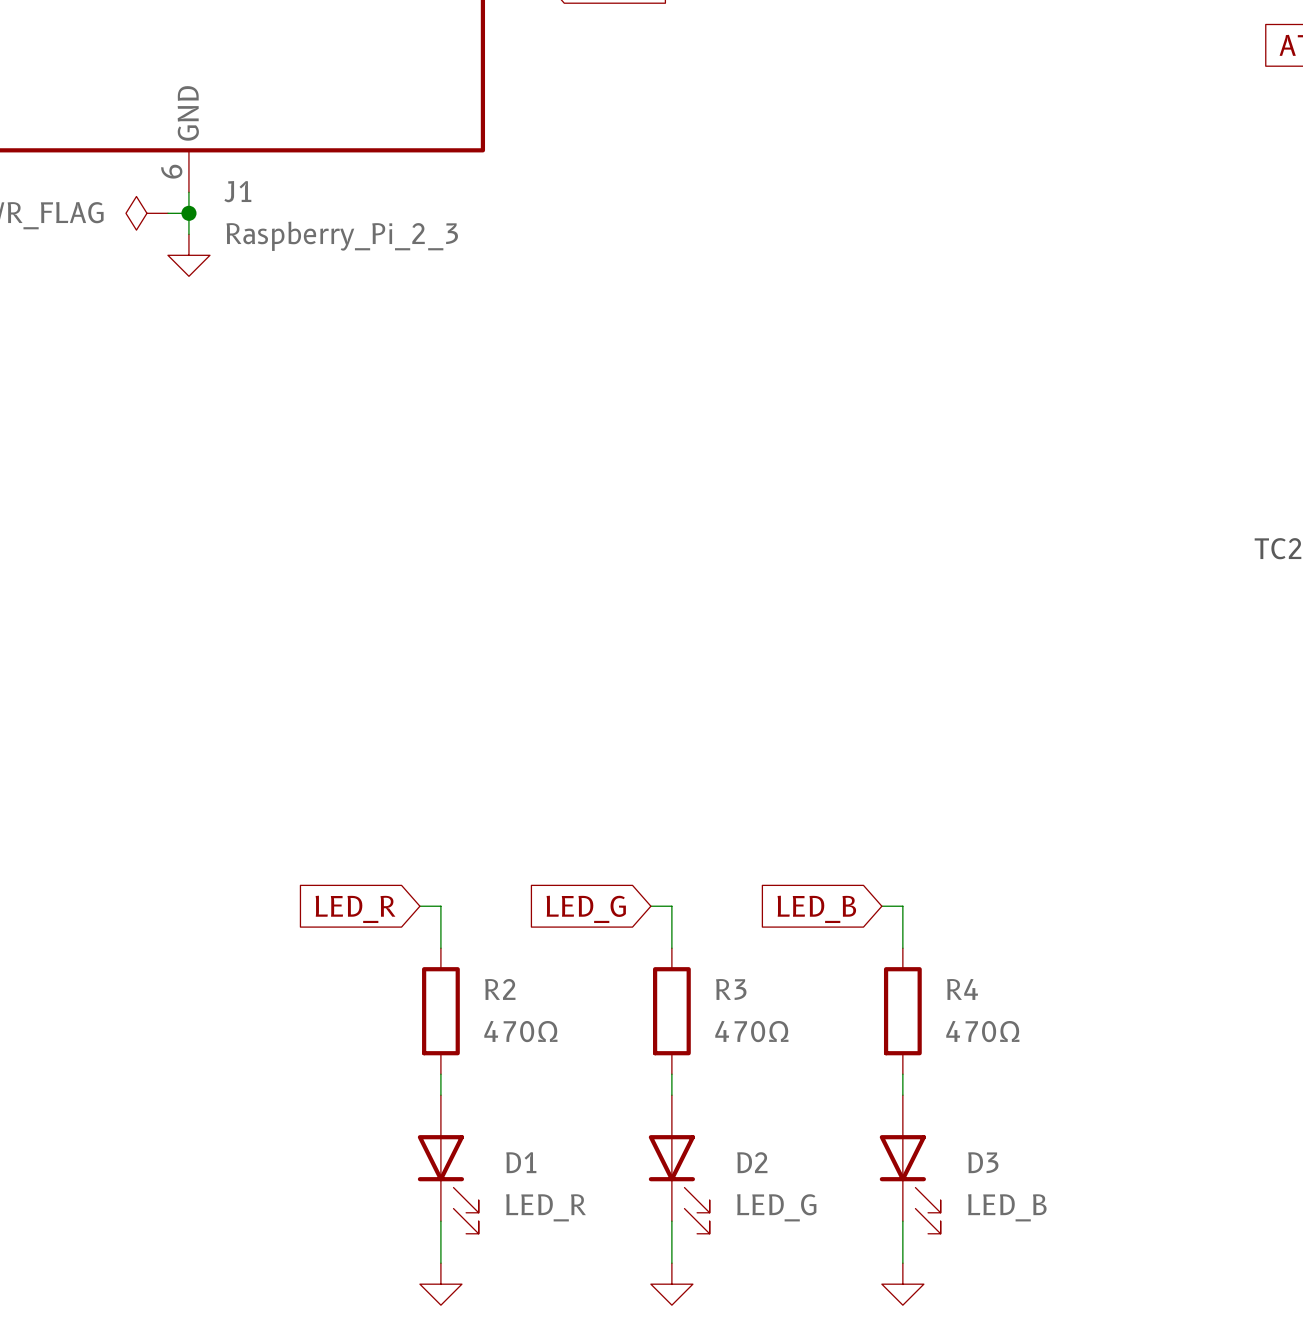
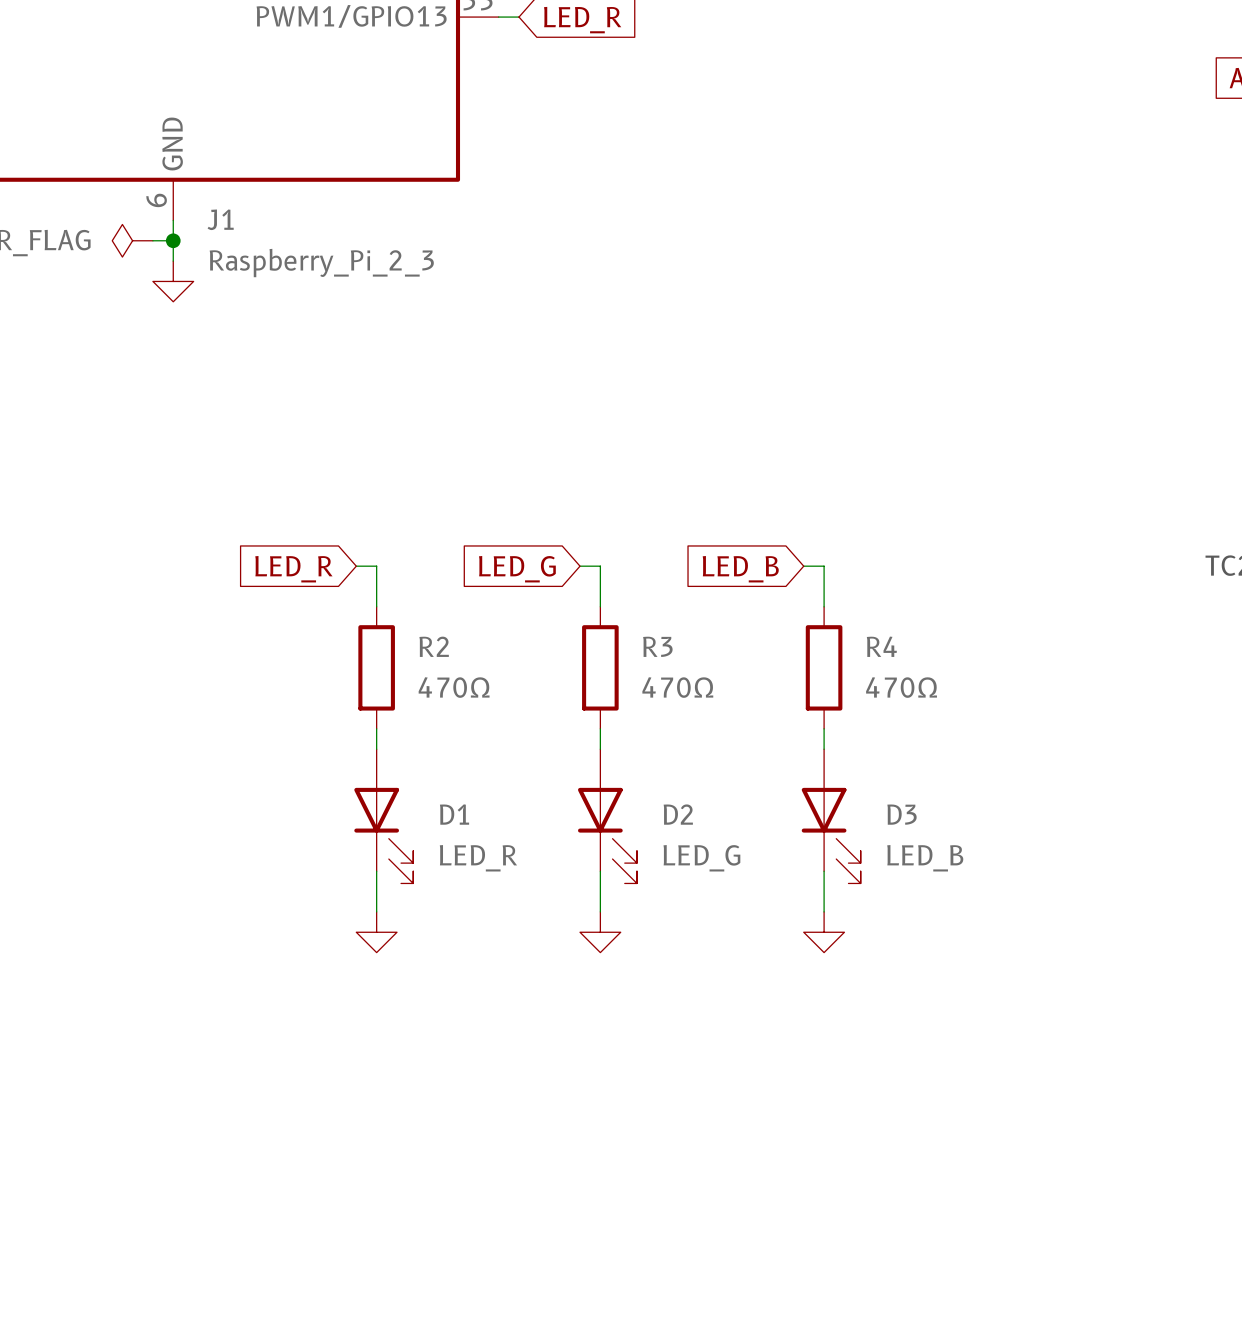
wire: (419, 906) (440, 906) (440, 948) -> (356, 566) (376, 566) (376, 606)
wire: (650, 906) (671, 906) (671, 948) -> (580, 566) (600, 566) (600, 606)
wire: (881, 906) (902, 906) (902, 948) -> (803, 566) (824, 566) (824, 606)
global label position: LED_R (355, 909) -> LED_R (293, 569)
global label position: LED_G (586, 909) -> LED_G (517, 569)
global label position: LED_B (816, 909) -> LED_B (740, 569)
power symbol: none -> (376, 932)
power symbol: none -> (600, 932)
power symbol: none -> (824, 932)
R2 position: (440, 1011) -> (376, 667)
R3 position: (671, 1011) -> (600, 667)
R4 position: (902, 1011) -> (824, 667)
wire: (440, 1074) (440, 1095) -> (376, 728) (376, 749)
wire: (671, 1074) (671, 1095) -> (600, 728) (600, 749)
wire: (902, 1074) (902, 1095) -> (824, 728) (824, 749)
D1 position: (448, 1164) -> (383, 816)
D2 position: (679, 1164) -> (607, 816)
D3 position: (910, 1164) -> (831, 816)
wire: (440, 1221) (440, 1263) -> (376, 871) (376, 911)
wire: (671, 1221) (671, 1263) -> (600, 871) (600, 911)
wire: (902, 1221) (902, 1263) -> (824, 871) (824, 911)
power symbol: (440, 1284) -> none
power symbol: (671, 1284) -> none
power symbol: (902, 1284) -> none

